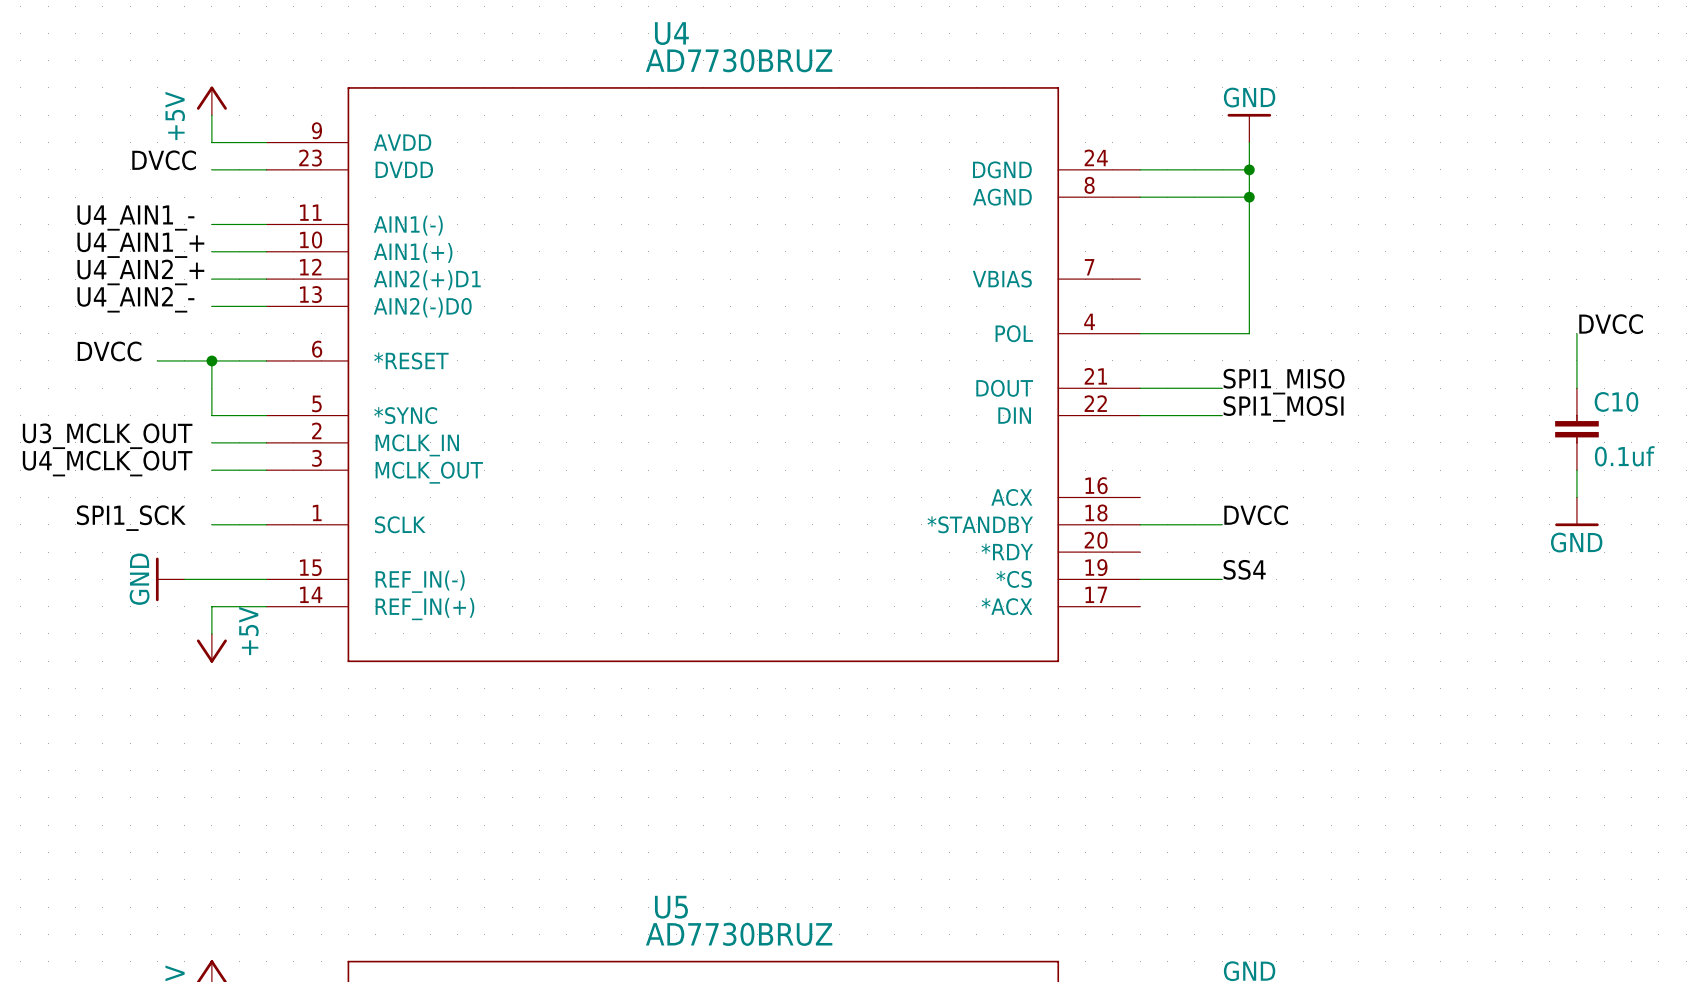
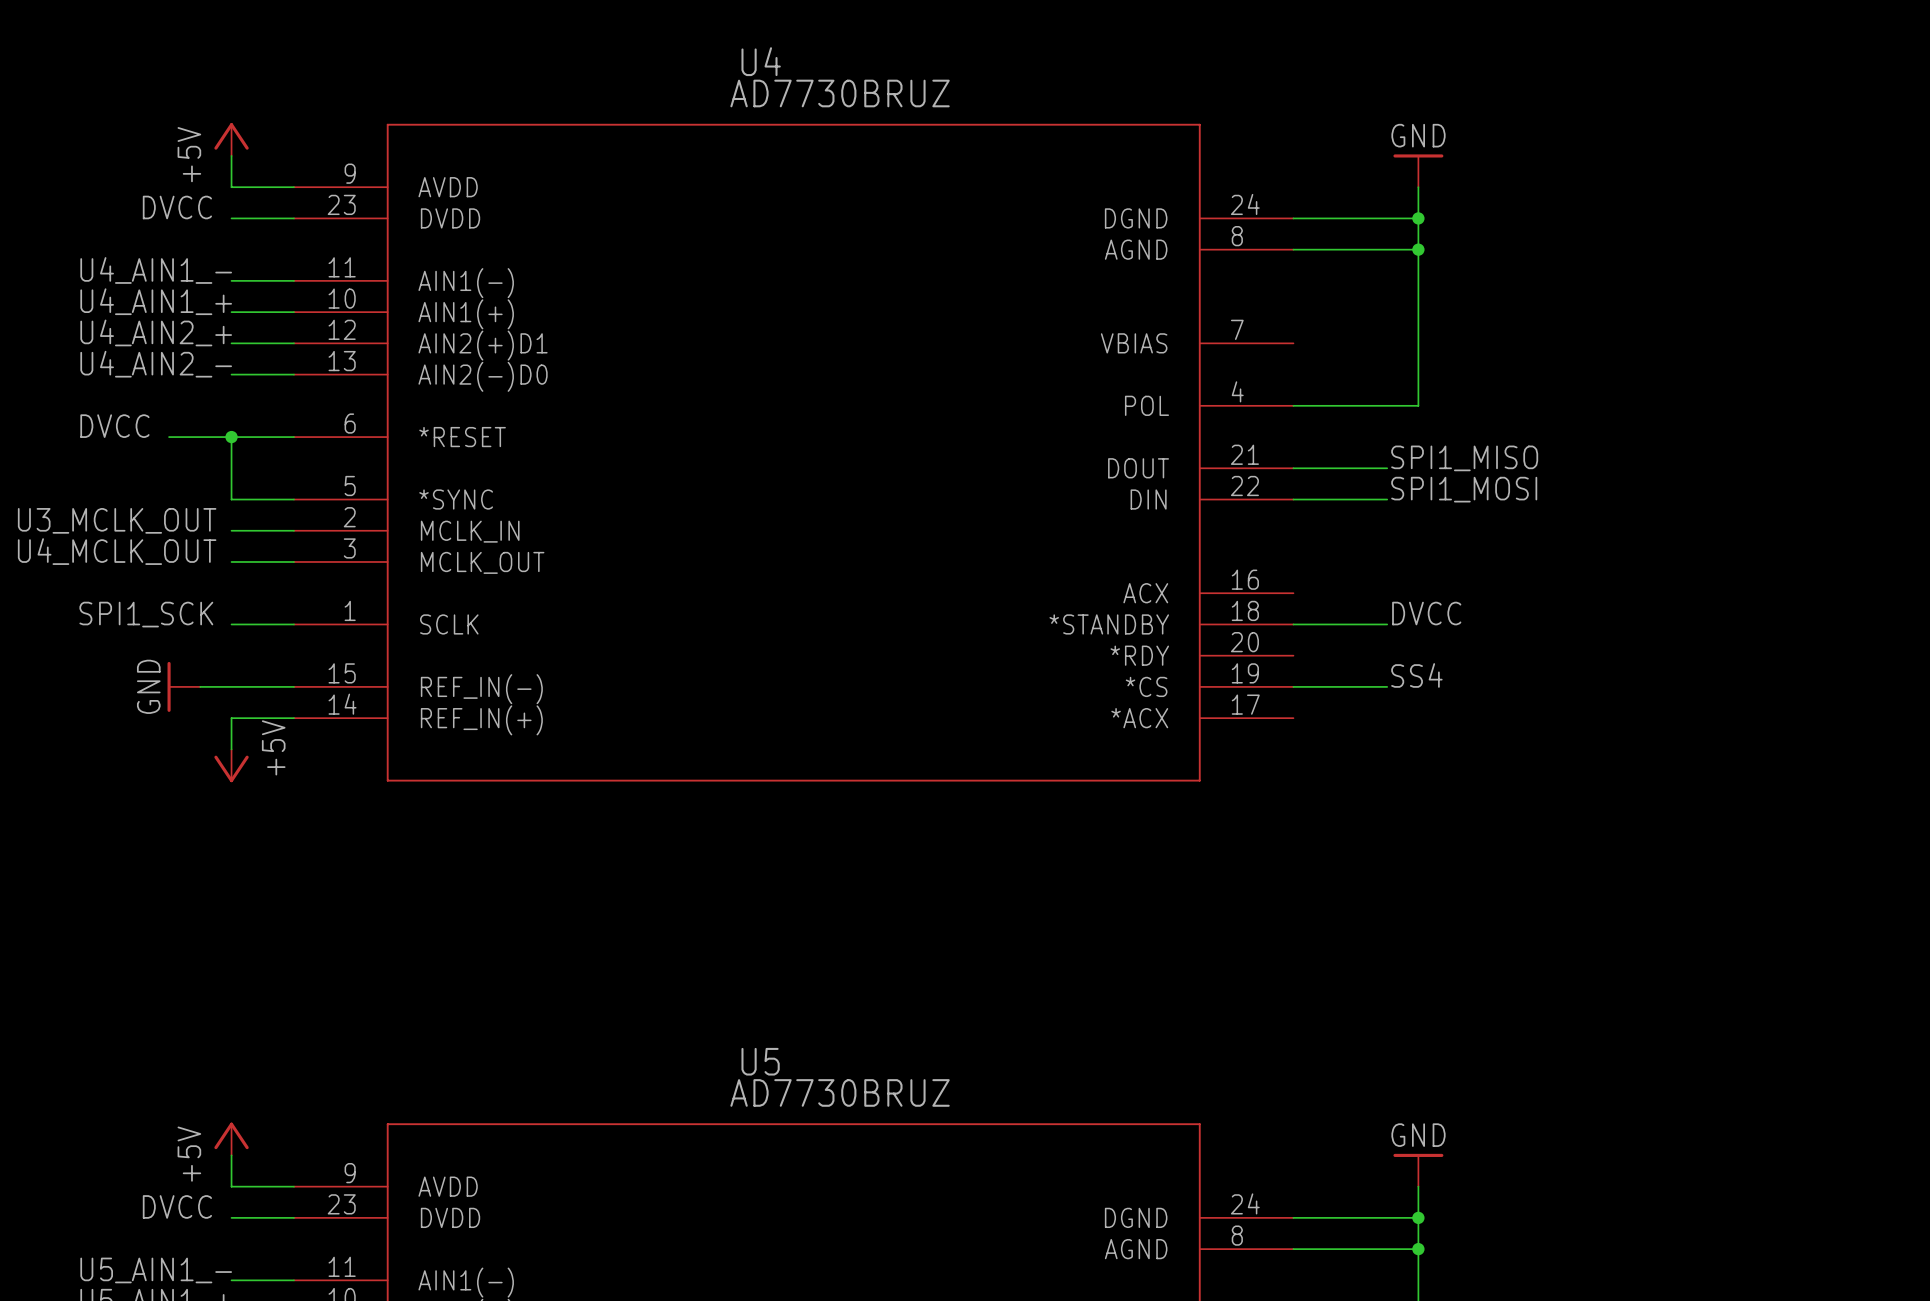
label: DVCC (1611, 324) -> none
wire: (1576, 333) (1576, 388) -> none
C10: 0.1uf (1576, 429) -> none
wire: (1576, 470) (1576, 497) -> none
power symbol: GND (1576, 511) -> none

